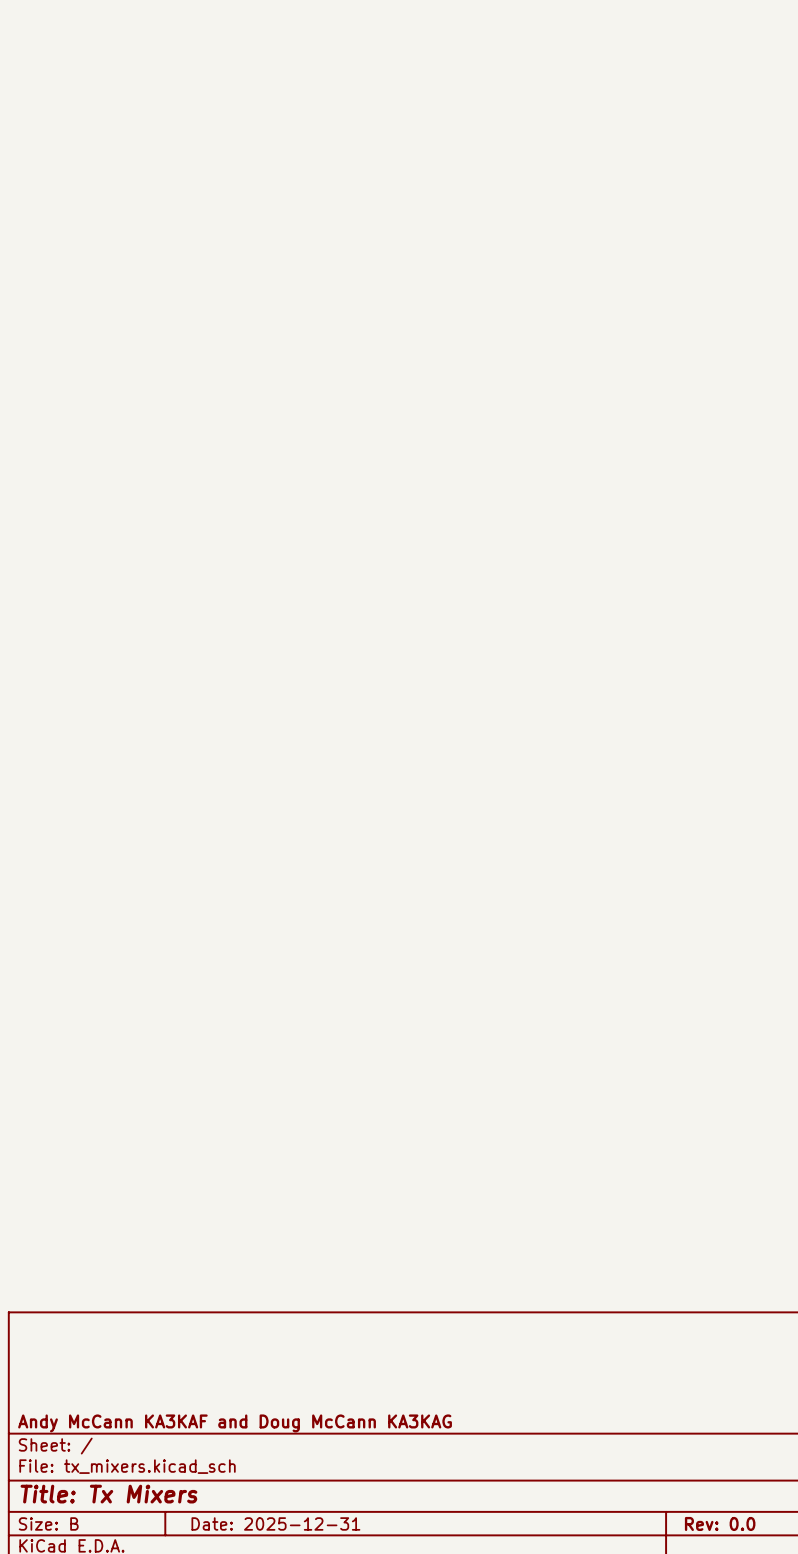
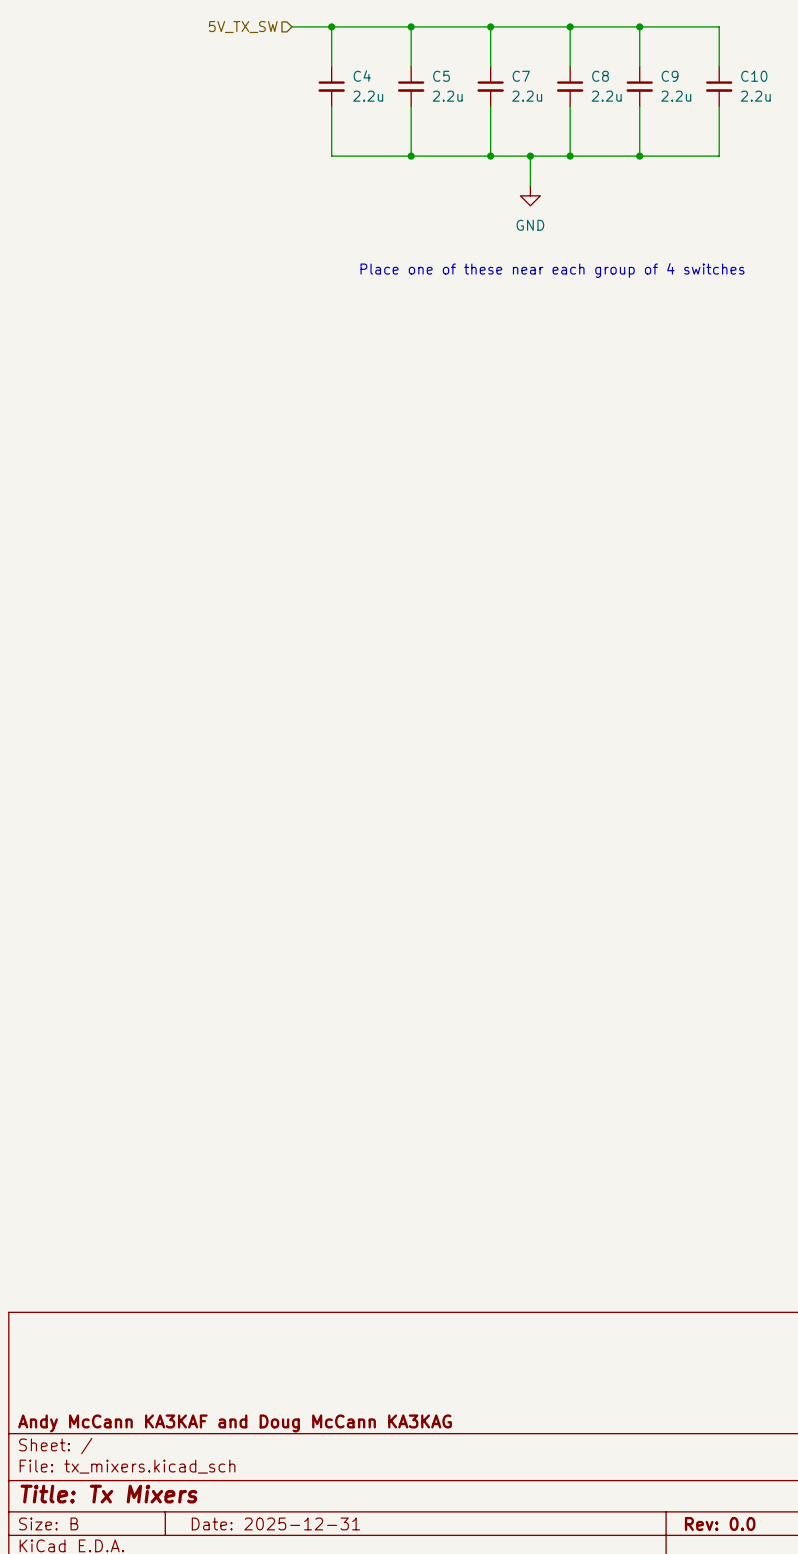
wire: none -> (291, 26) (719, 26) (719, 66)
wire: none -> (331, 26) (331, 66)
junction: none -> (331, 26)
wire: none -> (411, 26) (411, 66)
junction: none -> (411, 26)
wire: none -> (490, 26) (490, 66)
junction: none -> (490, 26)
wire: none -> (570, 26) (570, 66)
junction: none -> (570, 26)
wire: none -> (639, 26) (639, 66)
junction: none -> (639, 26)
hierarchical label: none -> 5V_TX_SW (243, 27)
C4: none -> 2.2u (331, 86)
C5: none -> 2.2u (411, 86)
C7: none -> 2.2u (490, 86)
C8: none -> 2.2u (570, 86)
C9: none -> 2.2u (639, 86)
C10: none -> 2.2u (719, 86)
wire: none -> (331, 106) (331, 156) (719, 156) (719, 106)
wire: none -> (411, 106) (411, 156)
wire: none -> (490, 106) (490, 156)
wire: none -> (570, 106) (570, 156)
wire: none -> (639, 106) (639, 156)
junction: none -> (411, 156)
junction: none -> (490, 156)
wire: none -> (530, 156) (530, 185)
junction: none -> (530, 156)
junction: none -> (570, 156)
junction: none -> (639, 156)
power symbol: none -> GND (530, 195)
text: none -> Place one of these near each group of 4 switches (552, 270)

